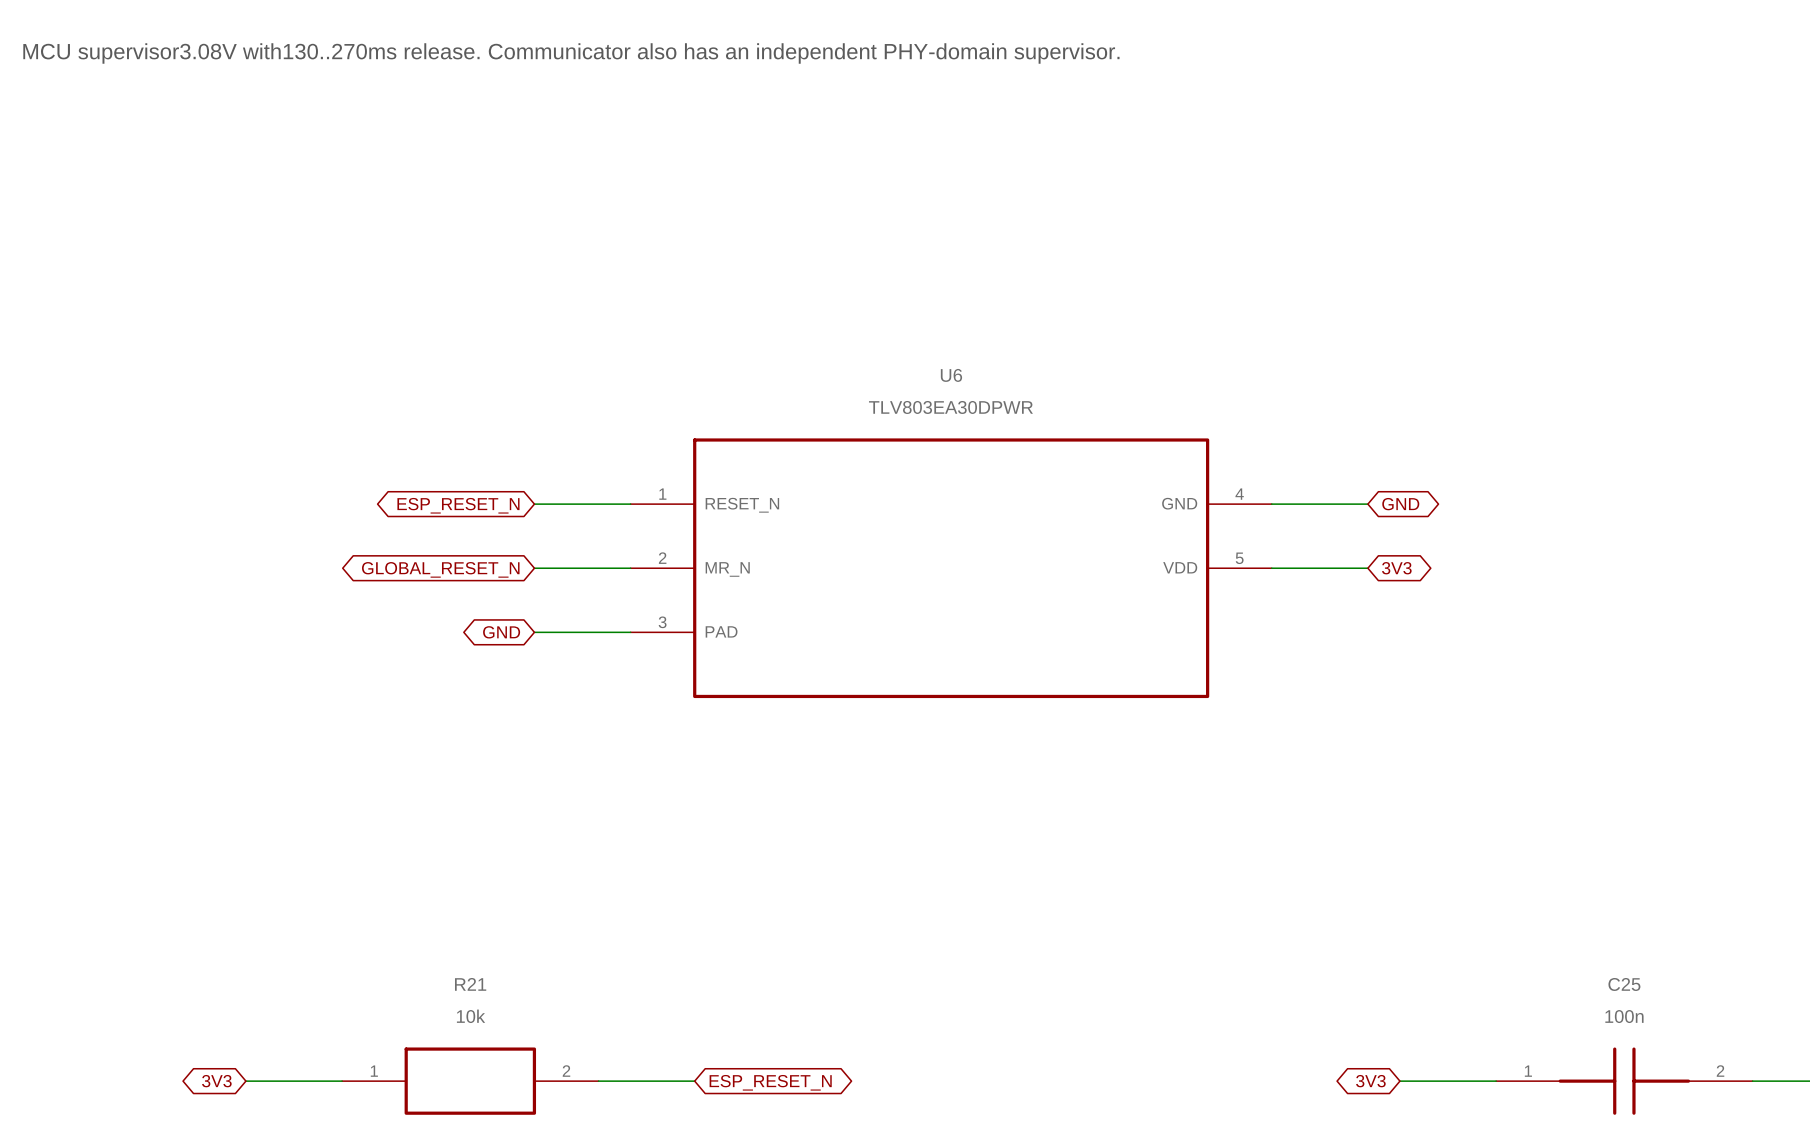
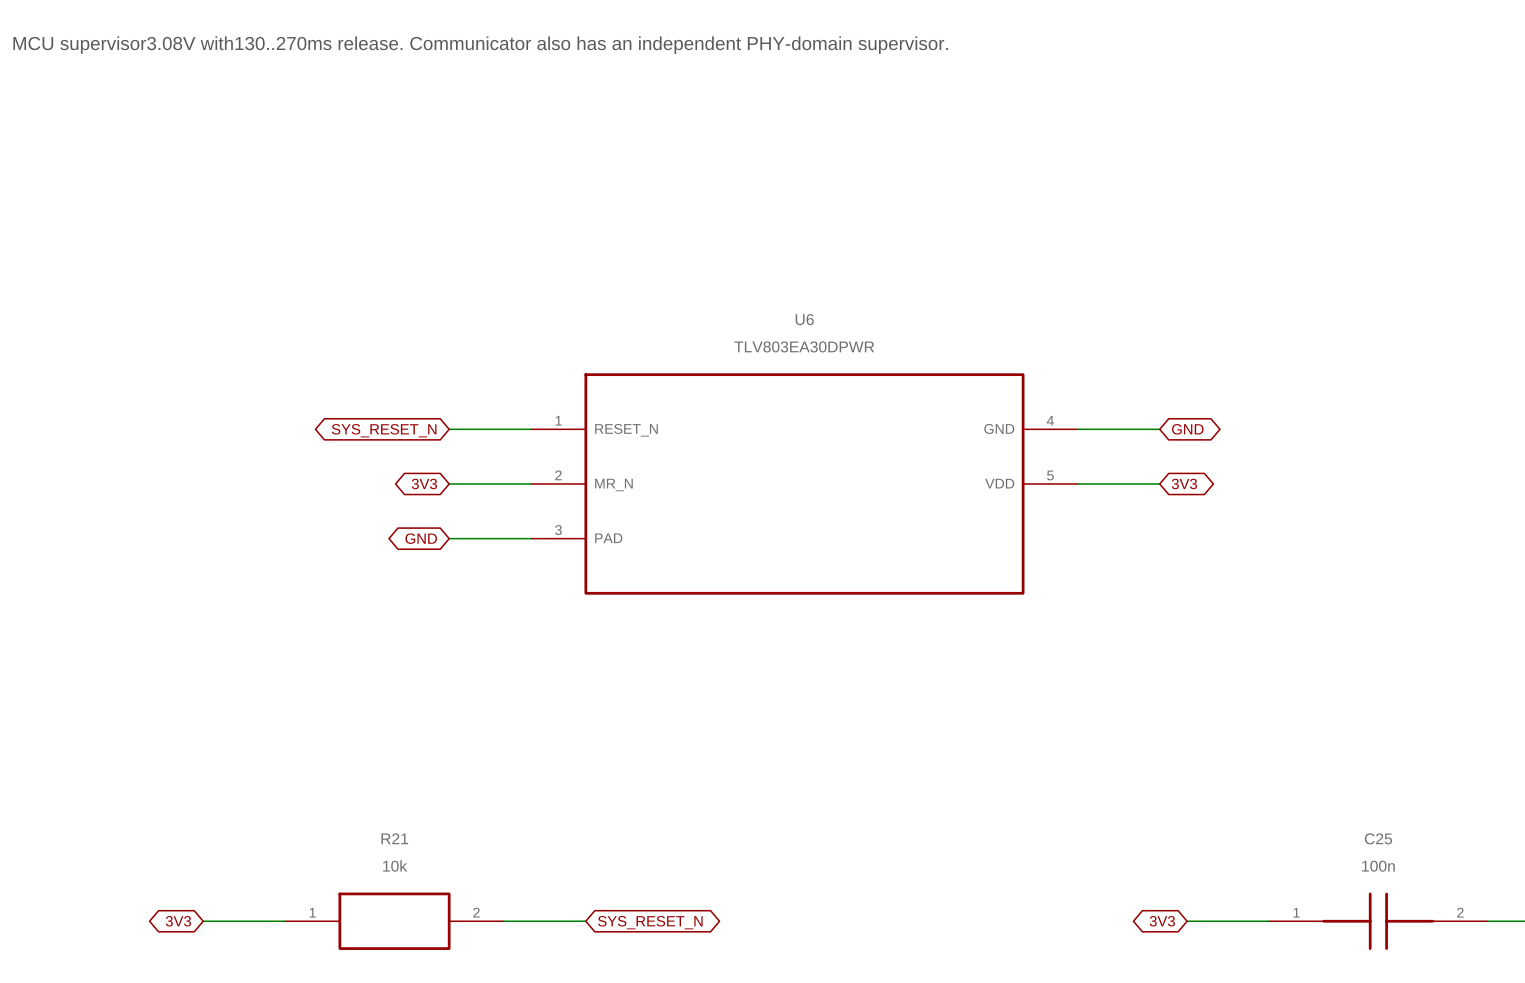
global label: ESP_RESET_N (458, 505) -> SYS_RESET_N (384, 430)
global label: GLOBAL_RESET_N (440, 569) -> 3V3 (424, 483)
global label: ESP_RESET_N (770, 1082) -> SYS_RESET_N (650, 922)

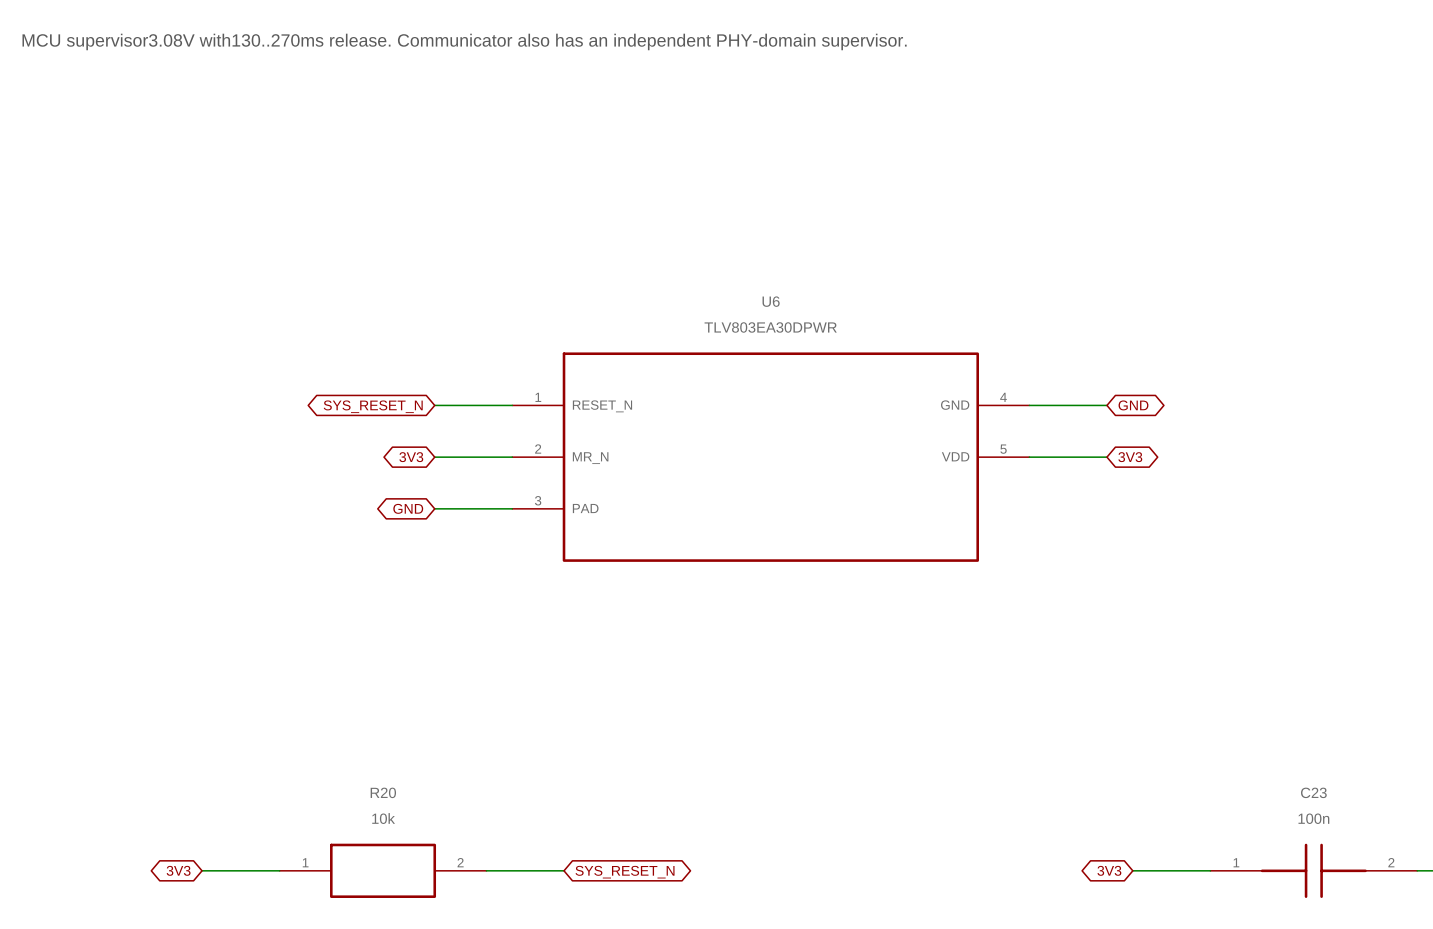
R21 name: R21 (394, 838) -> R20 (383, 792)
C25 name: C25 (1378, 838) -> C23 (1313, 792)

